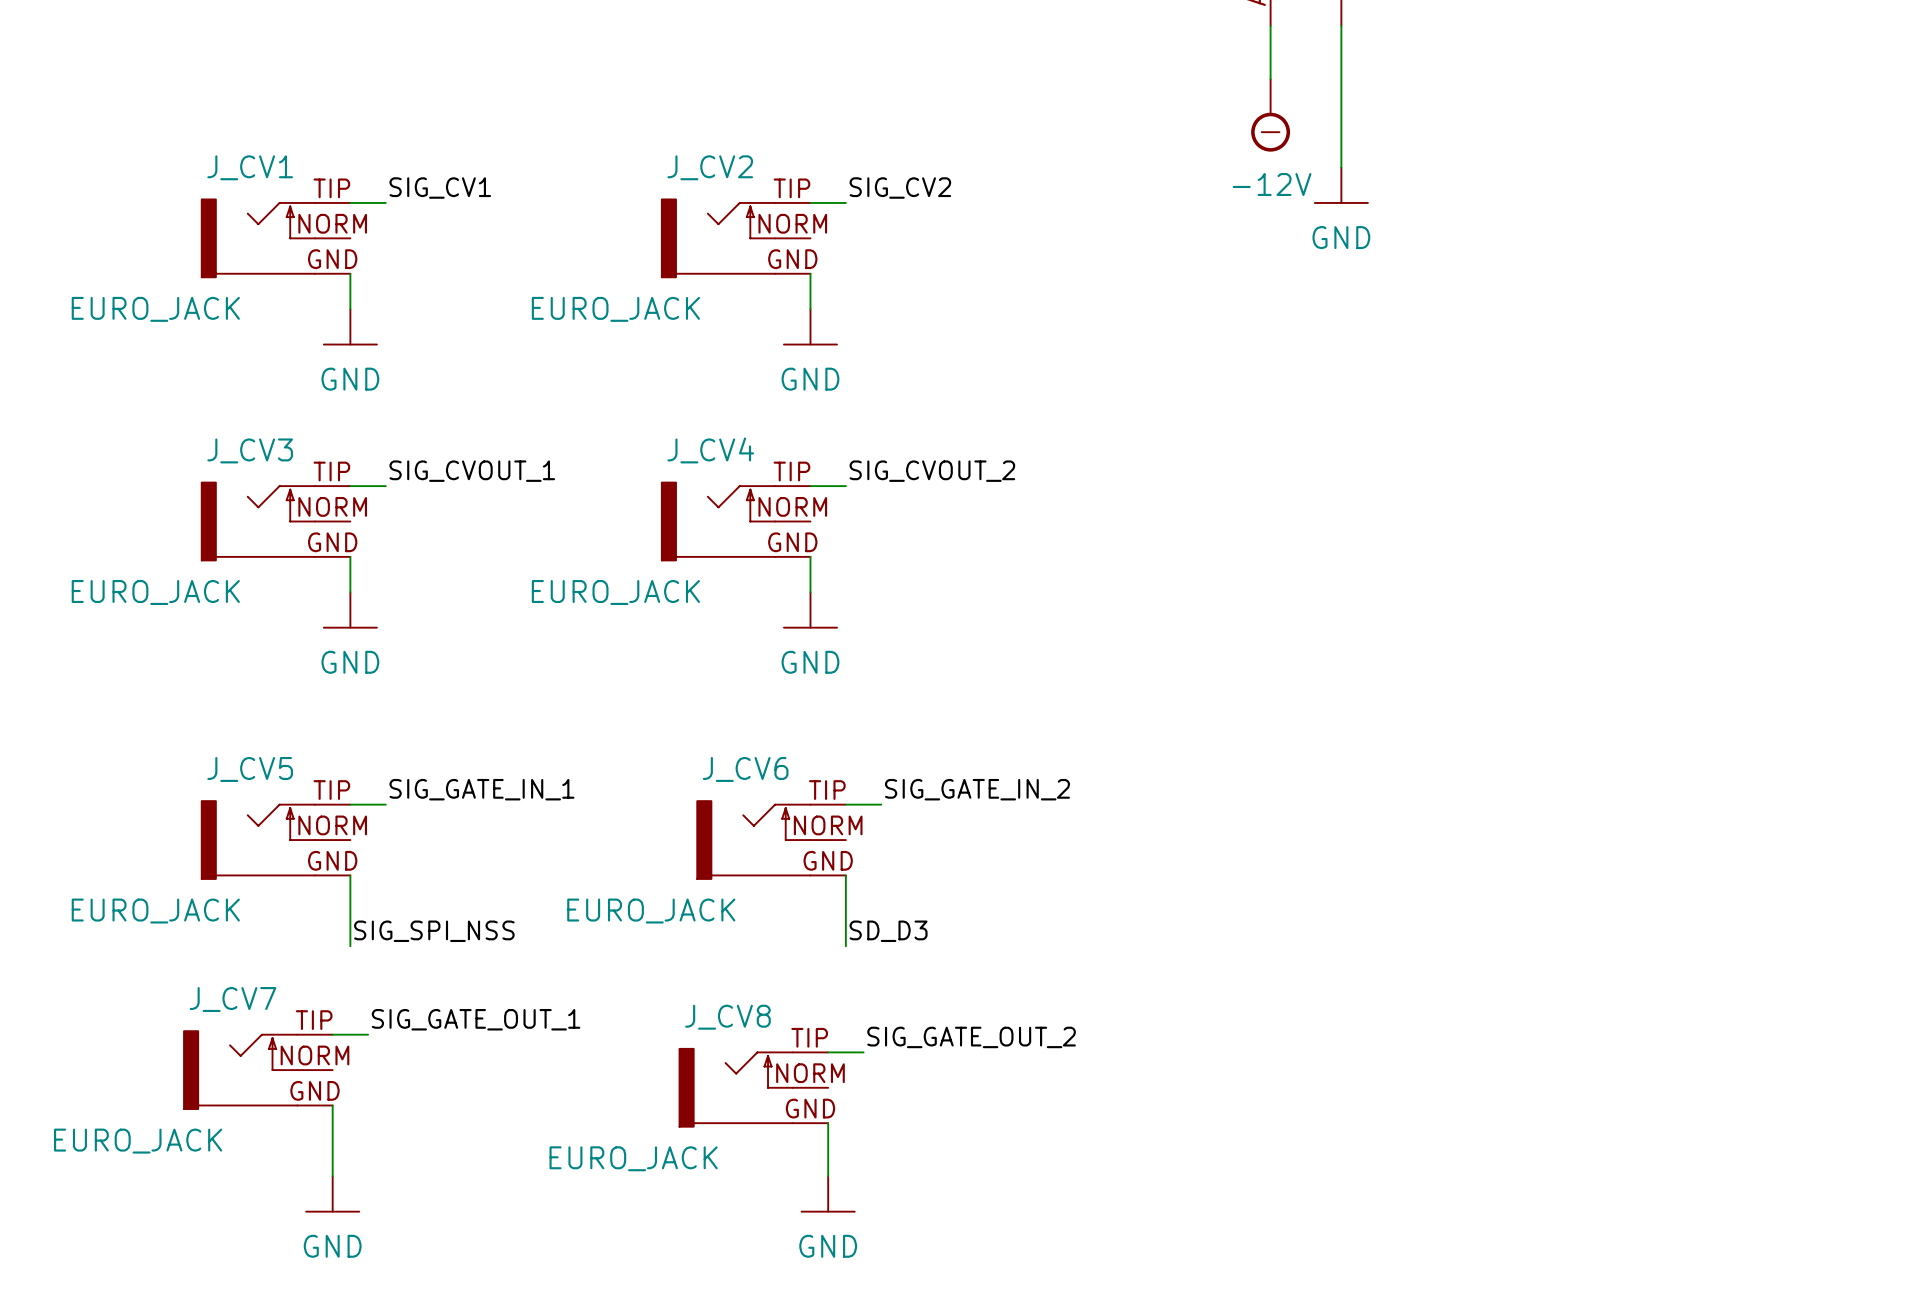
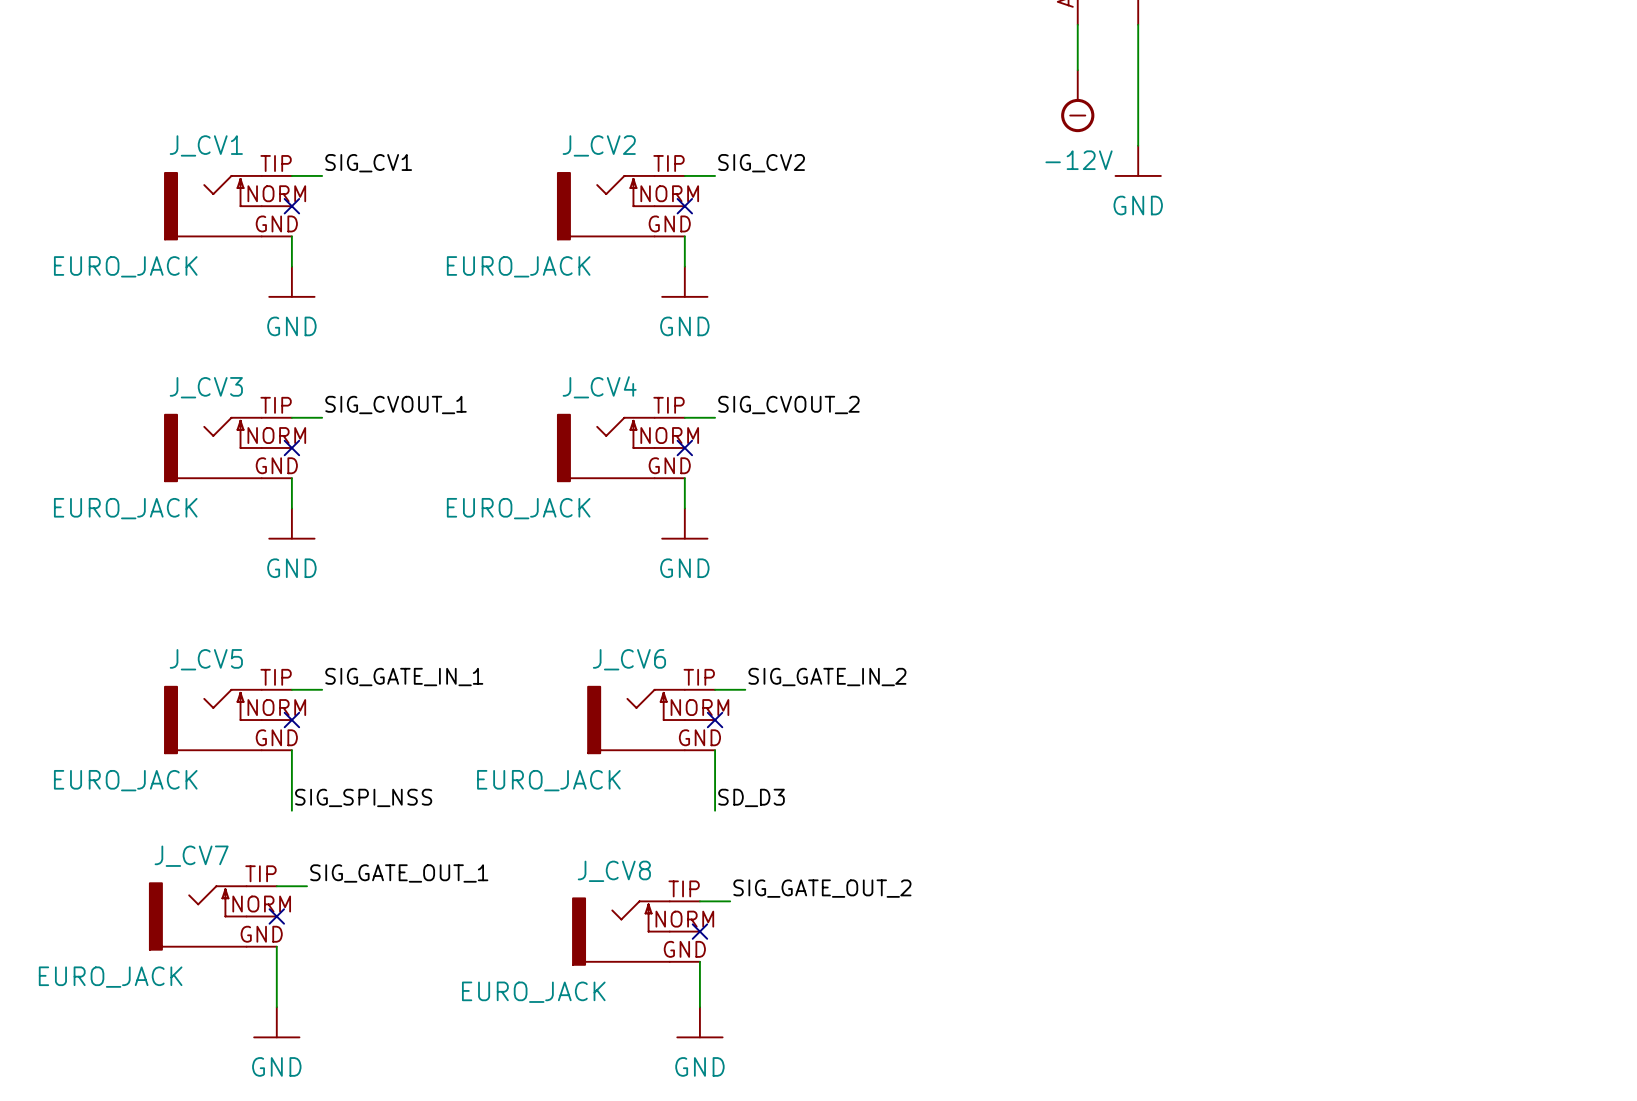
no-connect mark: none -> (291, 206)
no-connect mark: none -> (684, 206)
no-connect mark: none -> (291, 447)
no-connect mark: none -> (684, 447)
no-connect mark: none -> (291, 720)
no-connect mark: none -> (715, 720)
no-connect mark: none -> (276, 916)
no-connect mark: none -> (699, 931)

